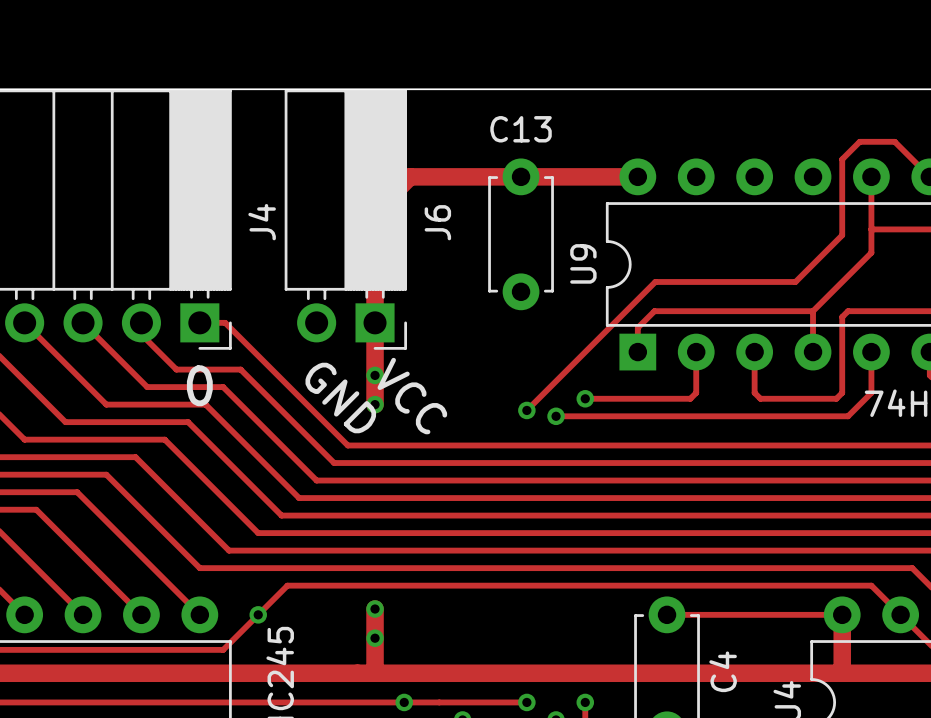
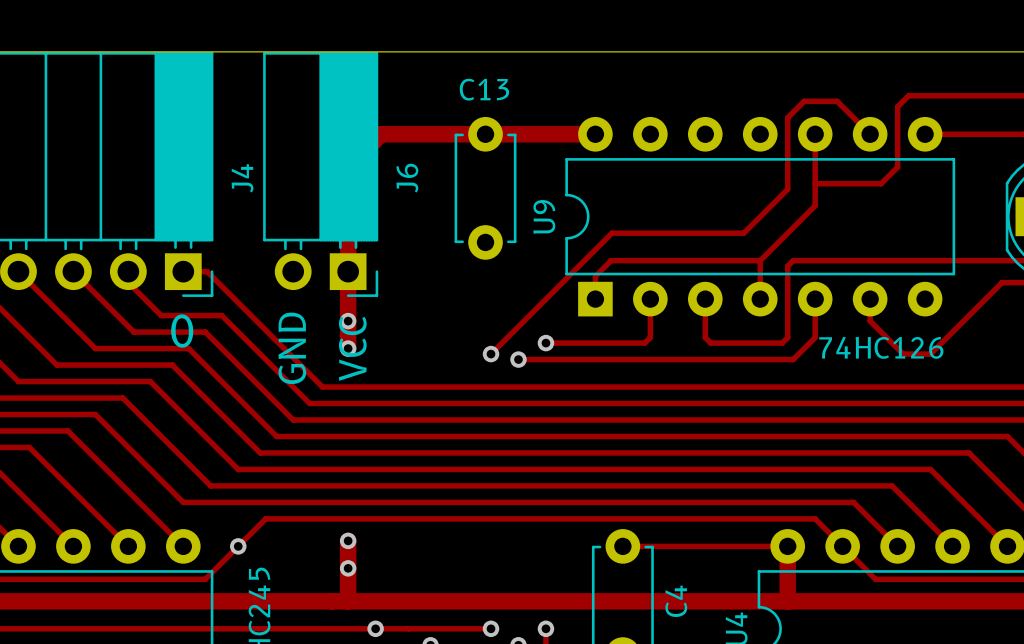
text rotation: 0° (412, 396) -> 135° counterclockwise (352, 348)
text rotation: 0° (340, 398) -> 135° counterclockwise (292, 348)

